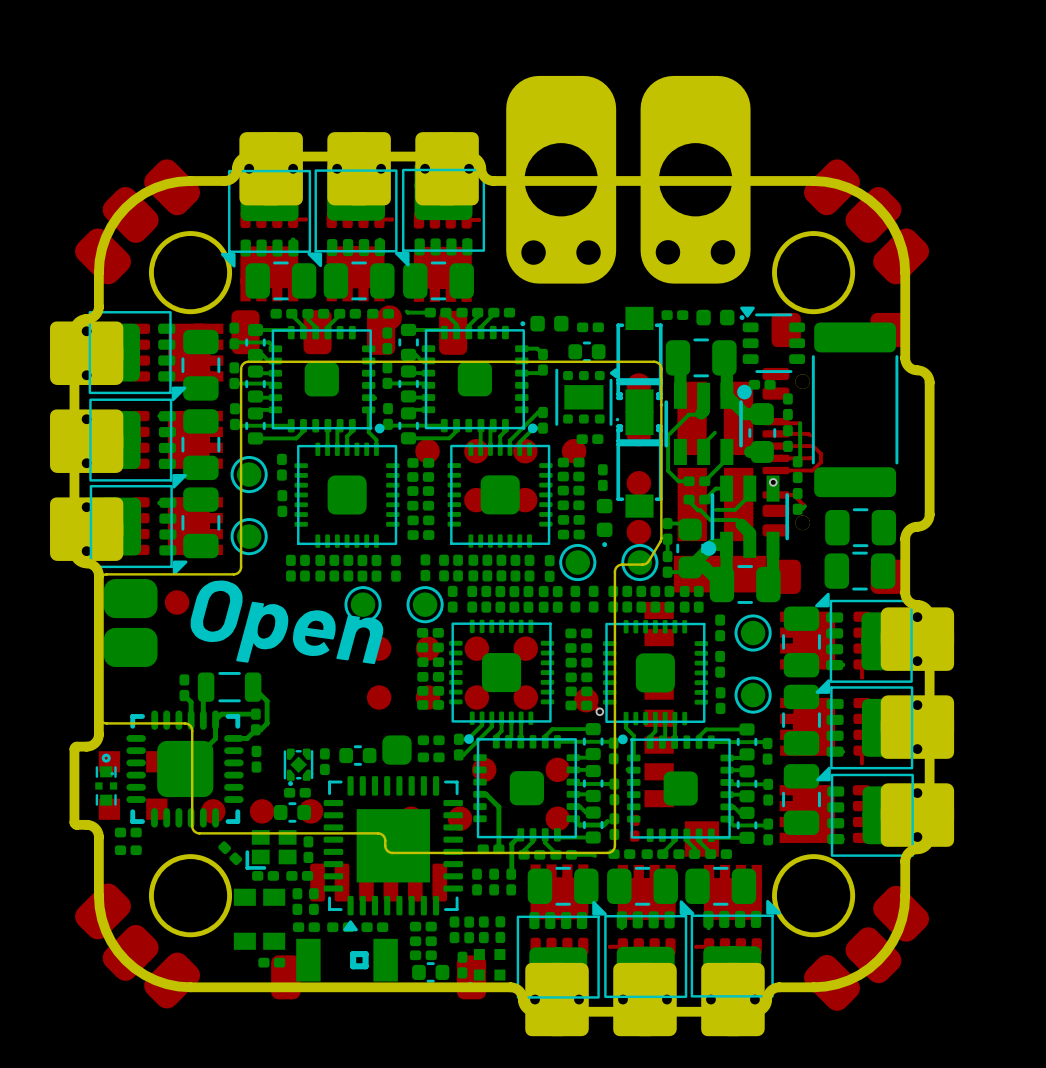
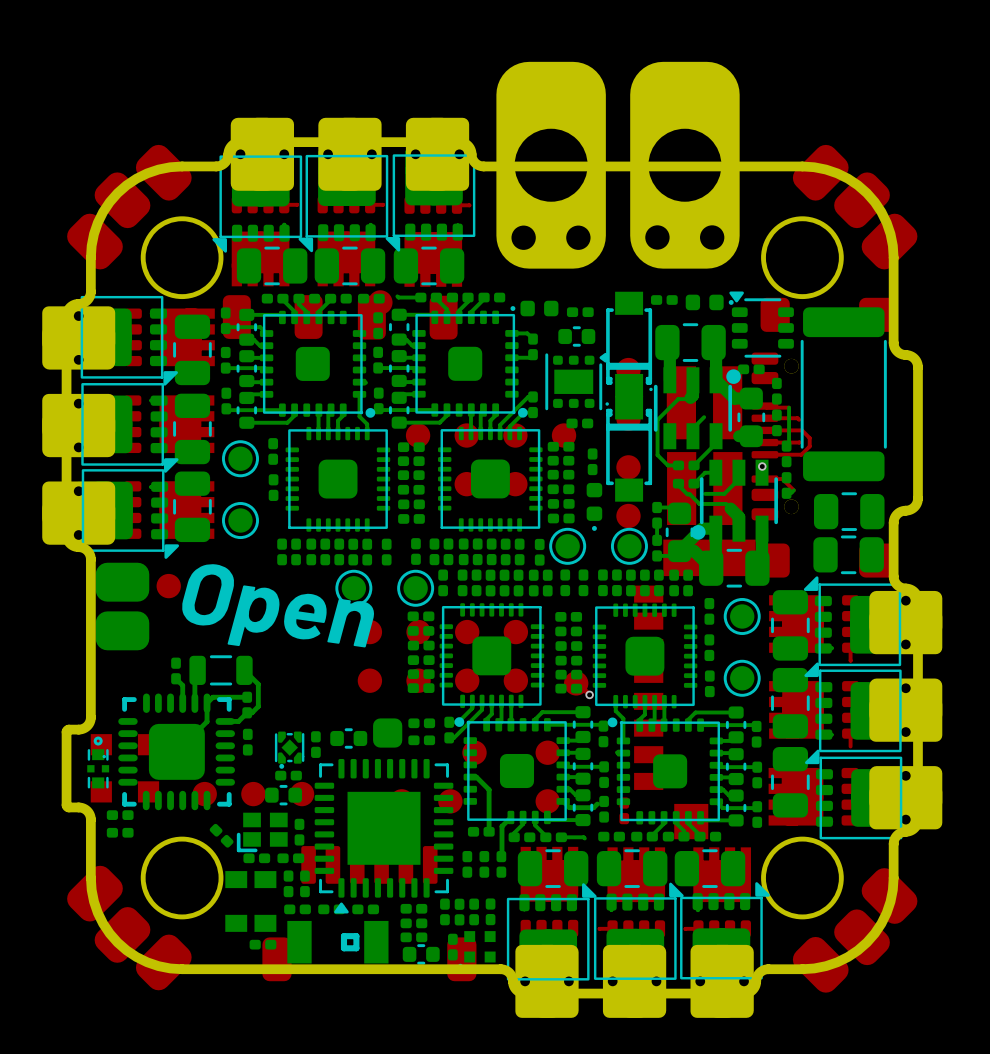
board edge: (654, 361) (244, 362) (241, 369) (240, 569) (233, 574) (106, 574) (101, 576) (99, 581) (100, 719) (105, 723) (184, 723) (190, 726) (192, 826) (193, 830) (197, 833) (378, 833) (384, 837) (386, 850) (392, 852) (611, 851) (614, 845) (615, 570) (620, 564) (646, 563) (661, 538) (661, 369) (659, 363) (654, 361) -> none

